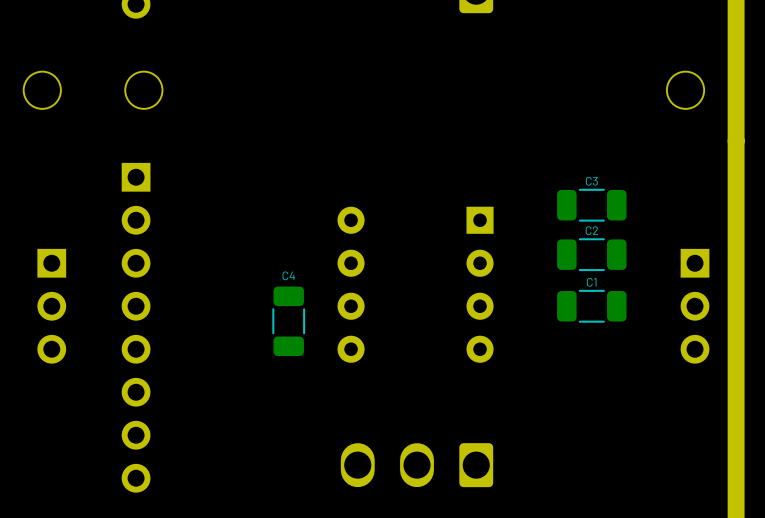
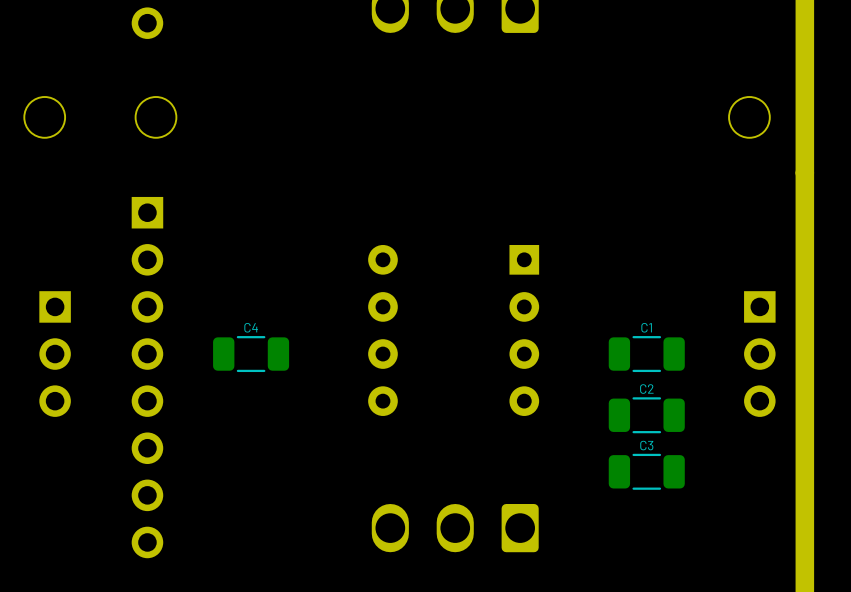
C3 position: (591, 205) -> (646, 471)
C2 position: (591, 254) -> (646, 415)
C4 rotation: 0° (288, 321) -> 90° clockwise (251, 354)
C4 position: (288, 321) -> (251, 354)

